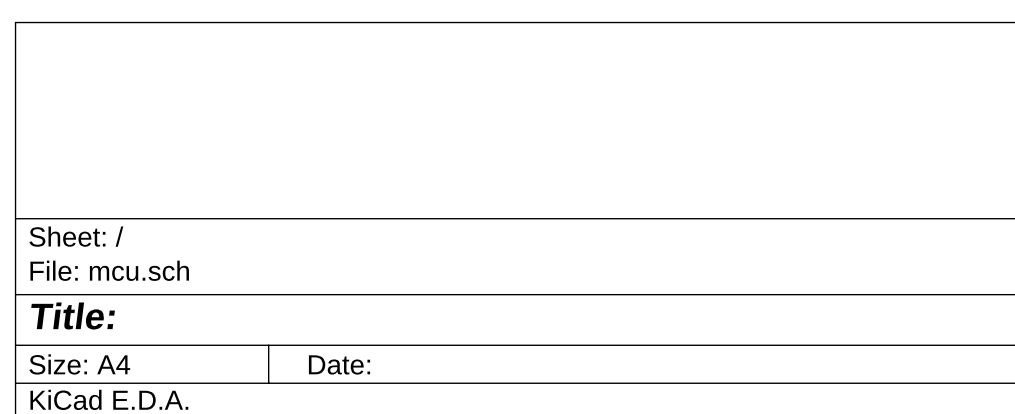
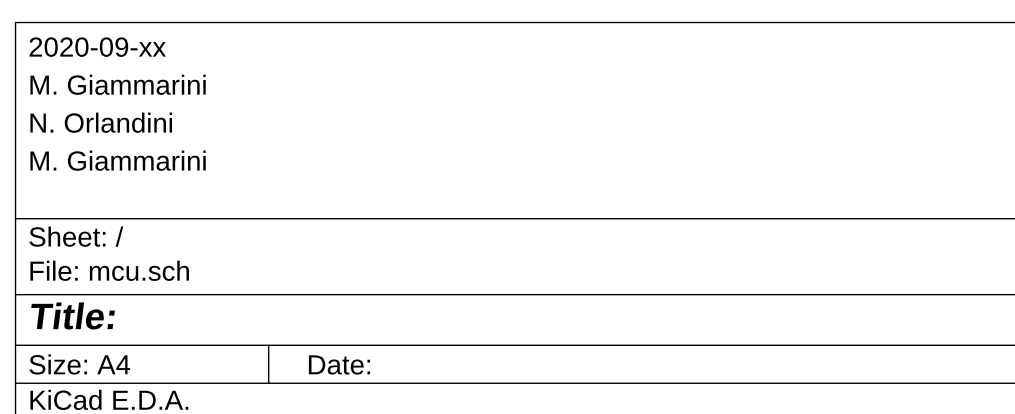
title block: none -> 2020-09-xx (97, 47)
title block: none -> M. Giammarini (118, 84)
title block: none -> N. Orlandini (101, 122)
title block: none -> M. Giammarini (118, 160)

